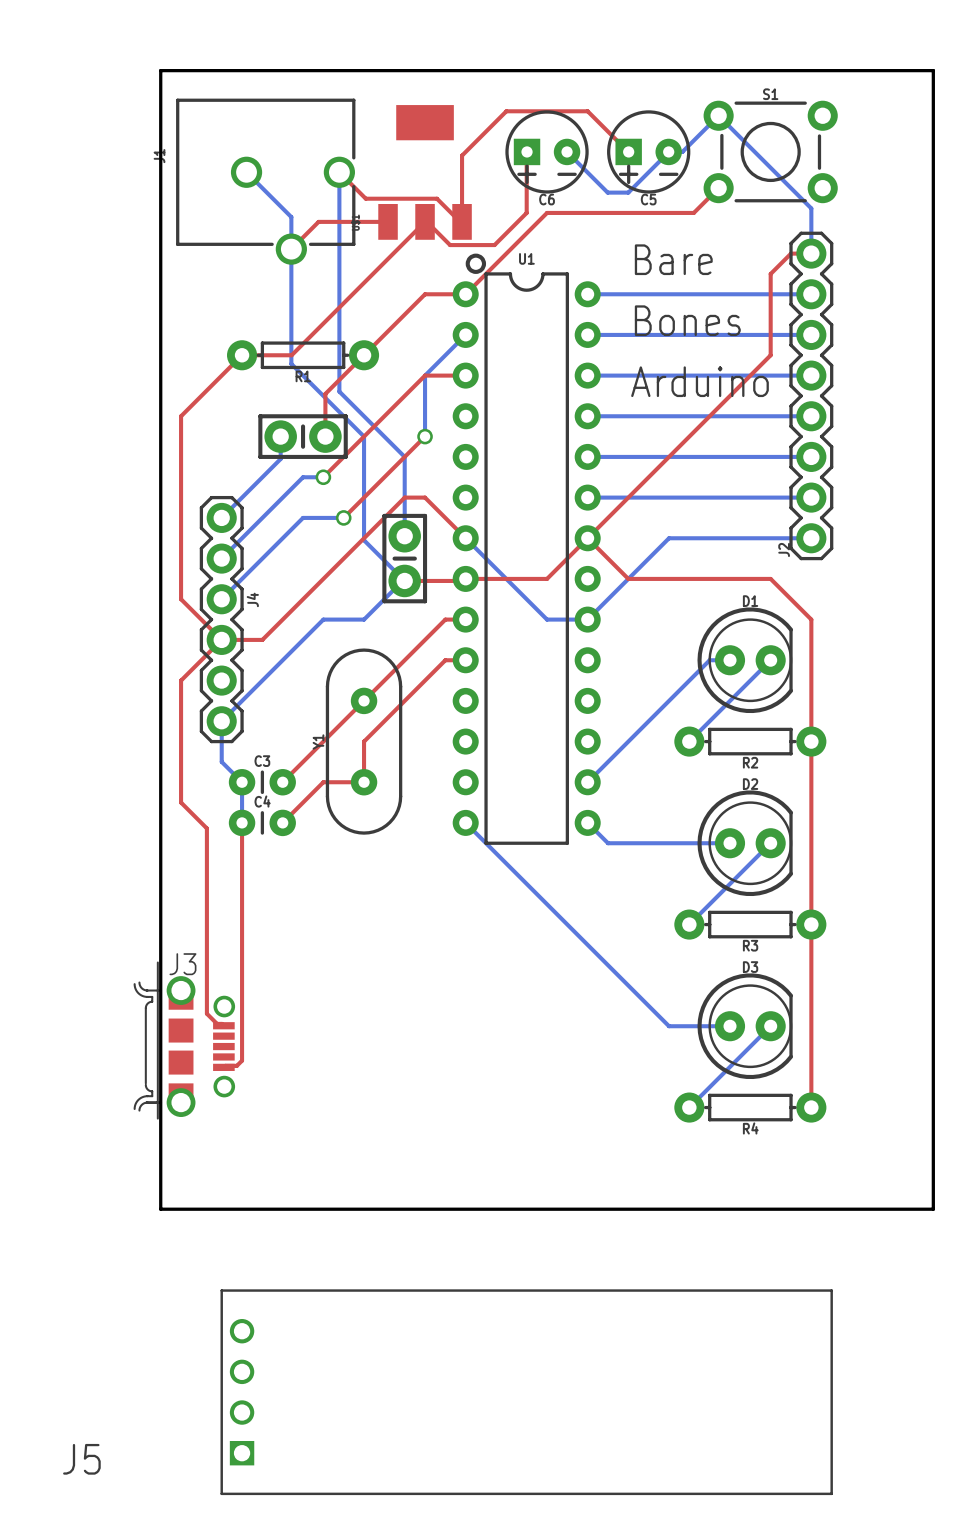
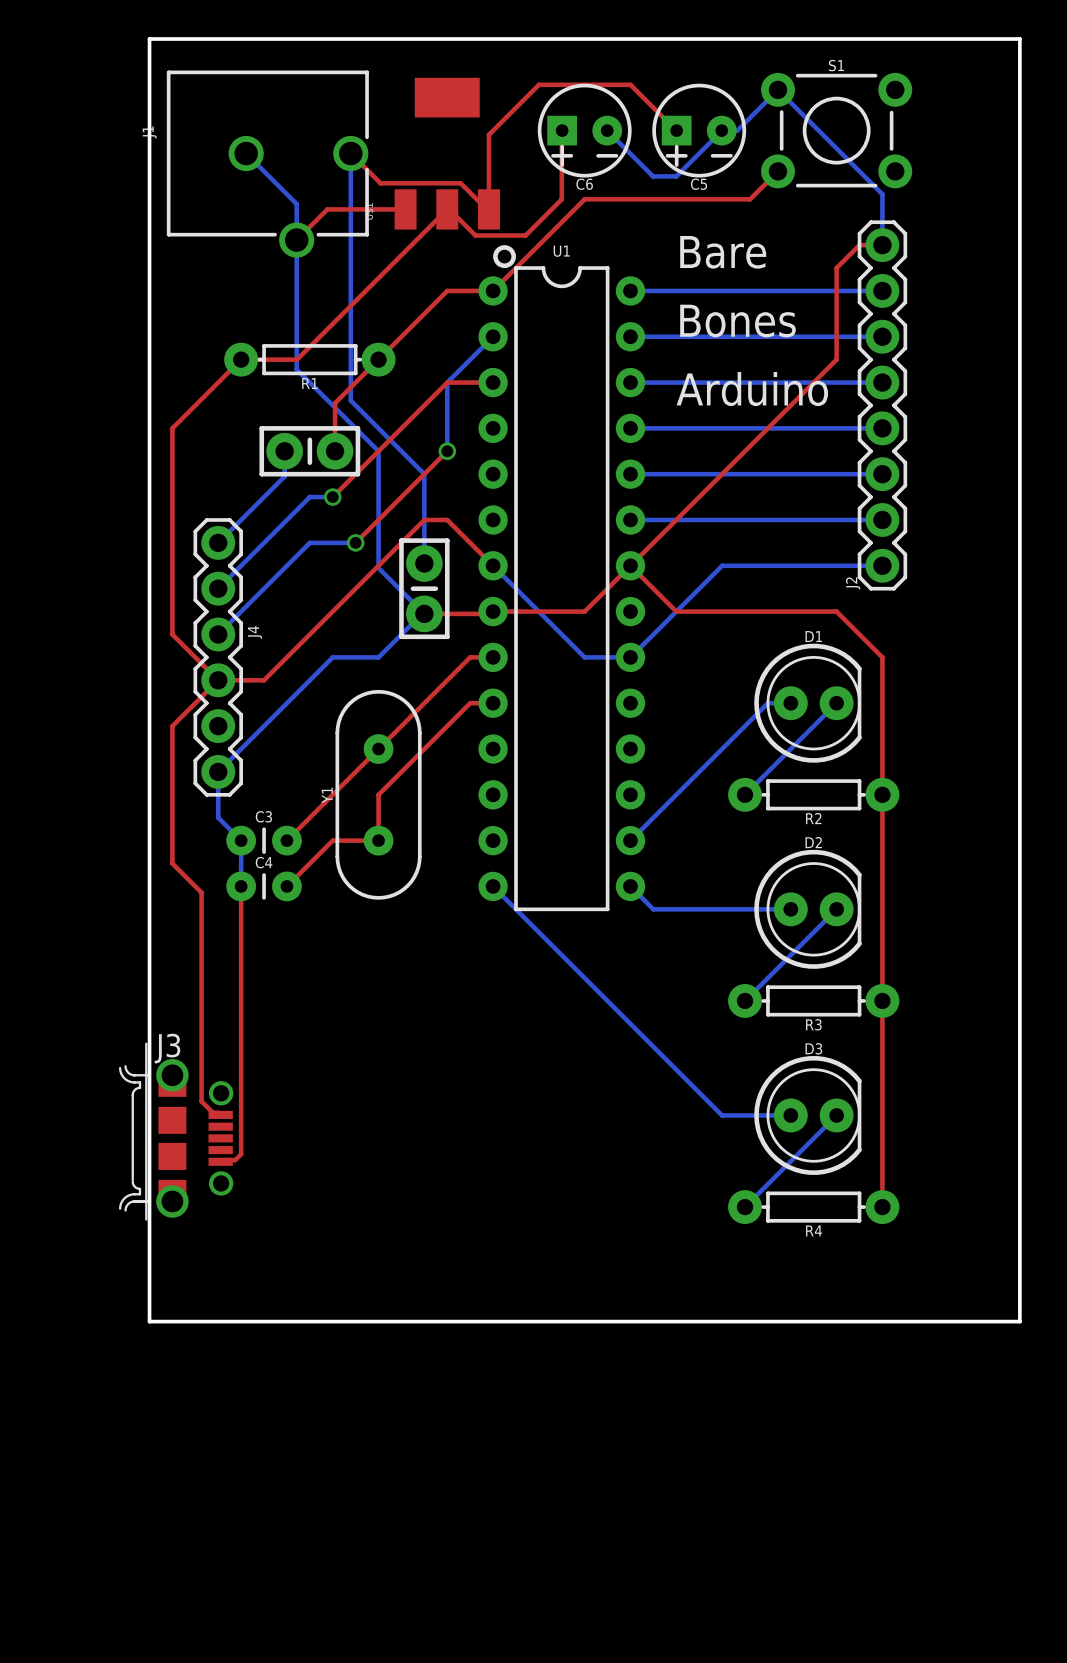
J5: (526, 1392) -> none

